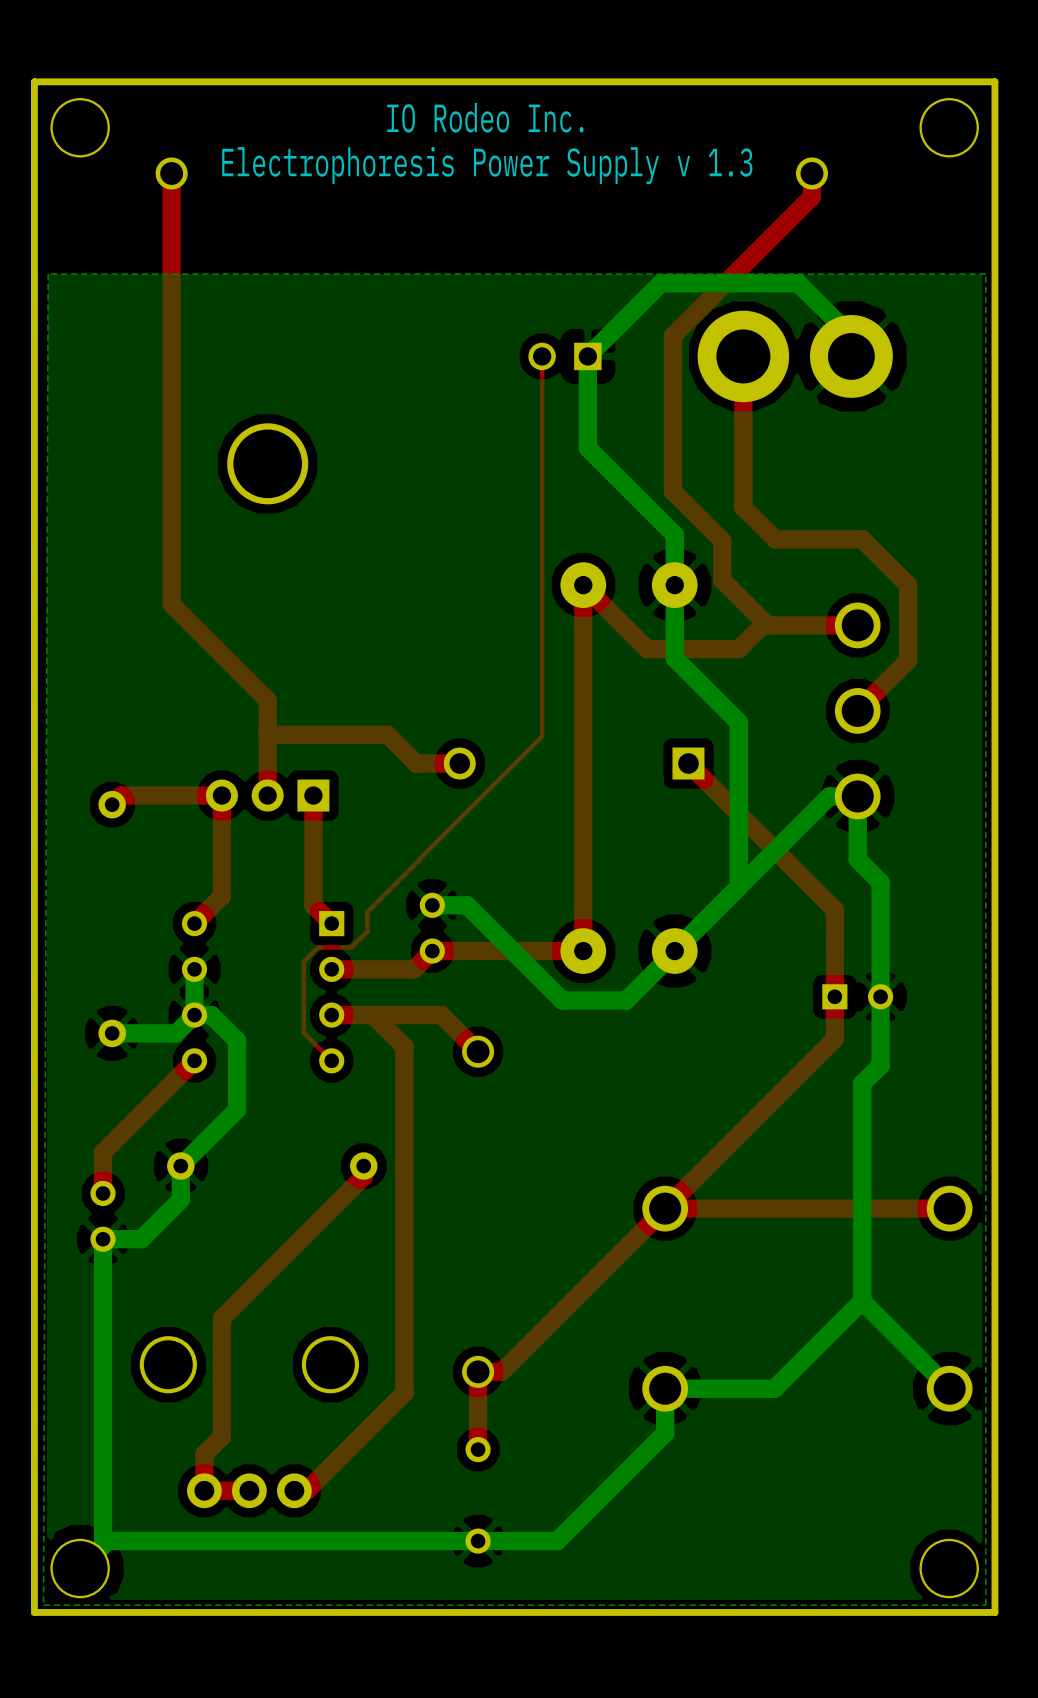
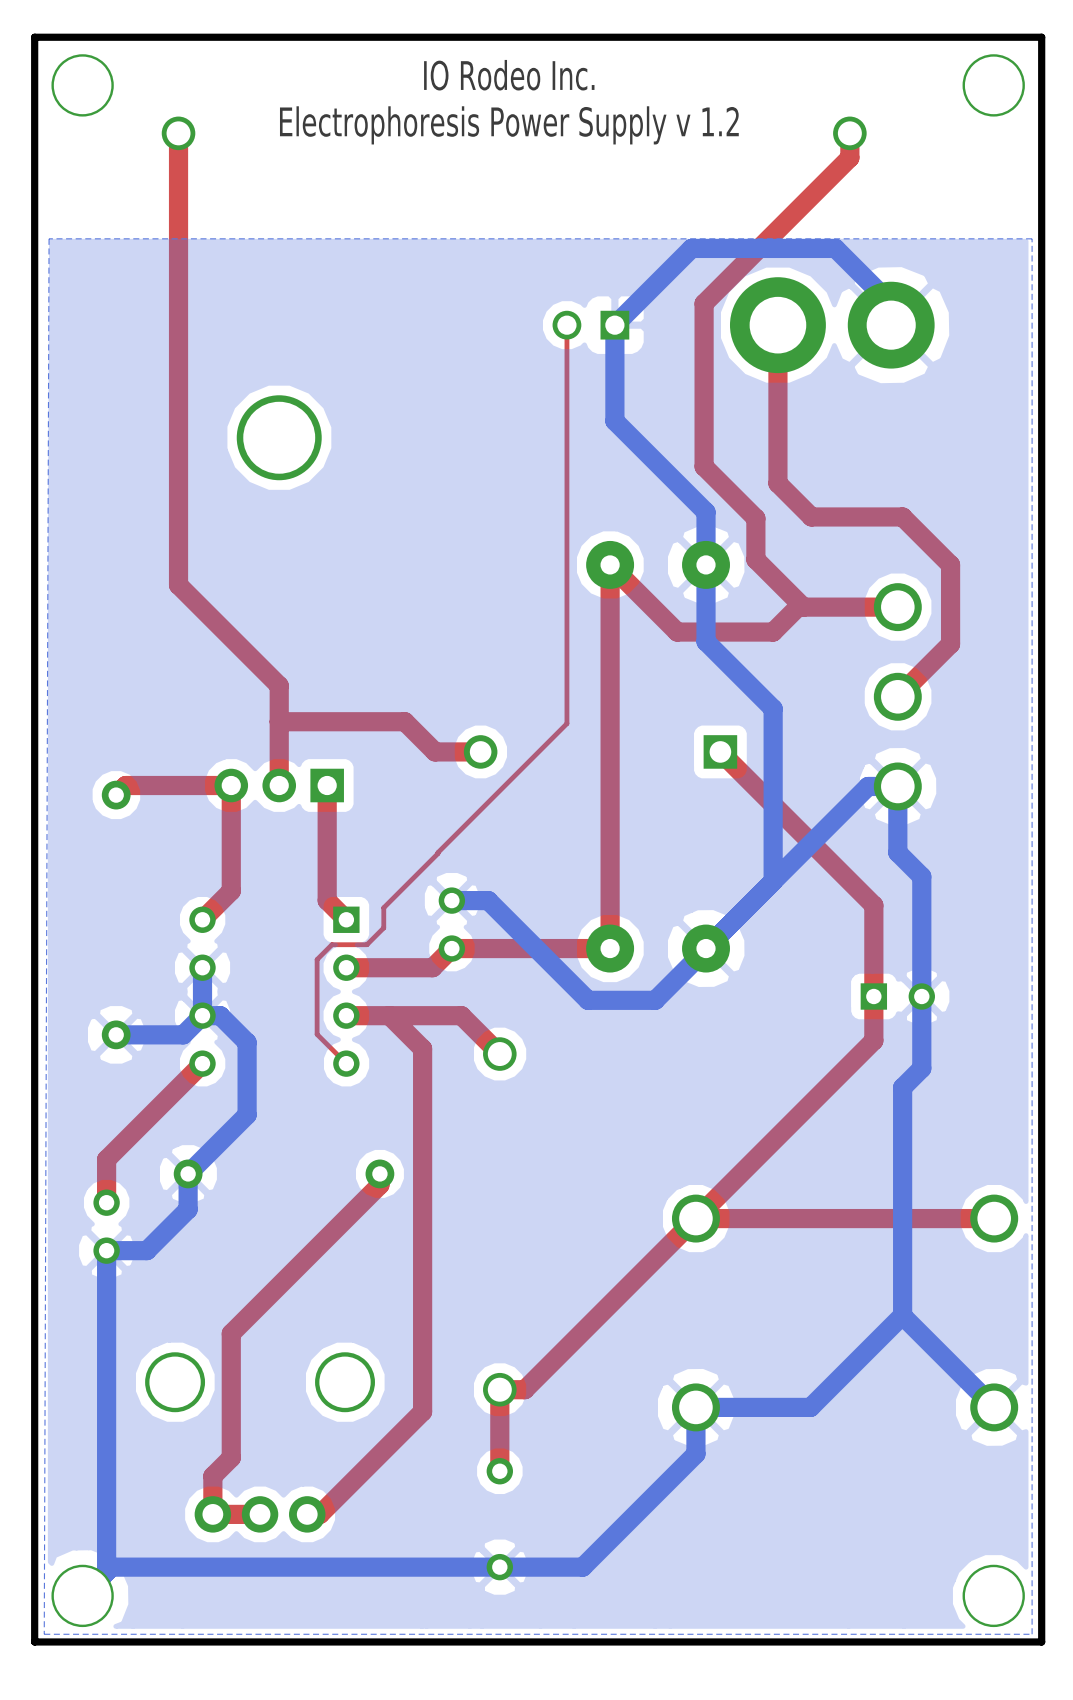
text: Electrophoresis Power Supply v 1.3 (487, 165) -> Electrophoresis Power Supply v 1.2 (509, 125)

